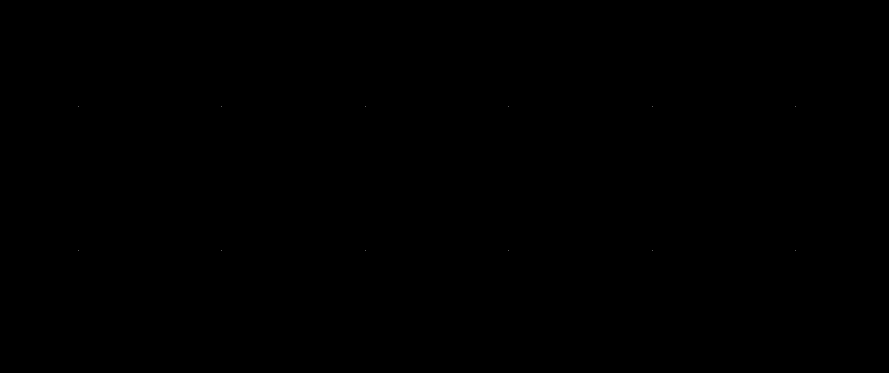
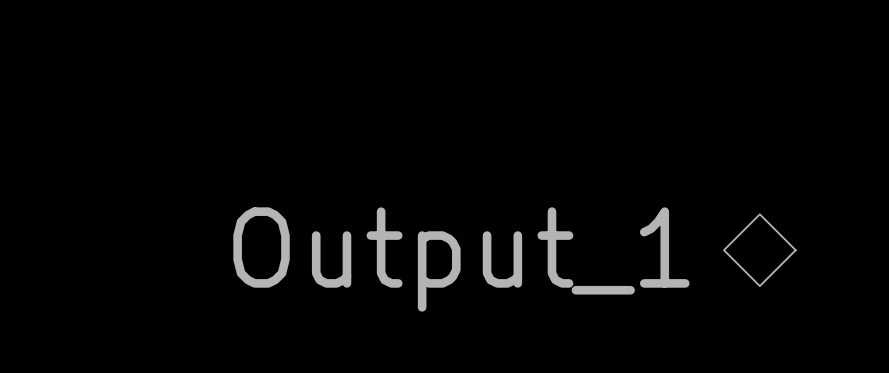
hierarchical label: none -> Output_1 (461, 259)

